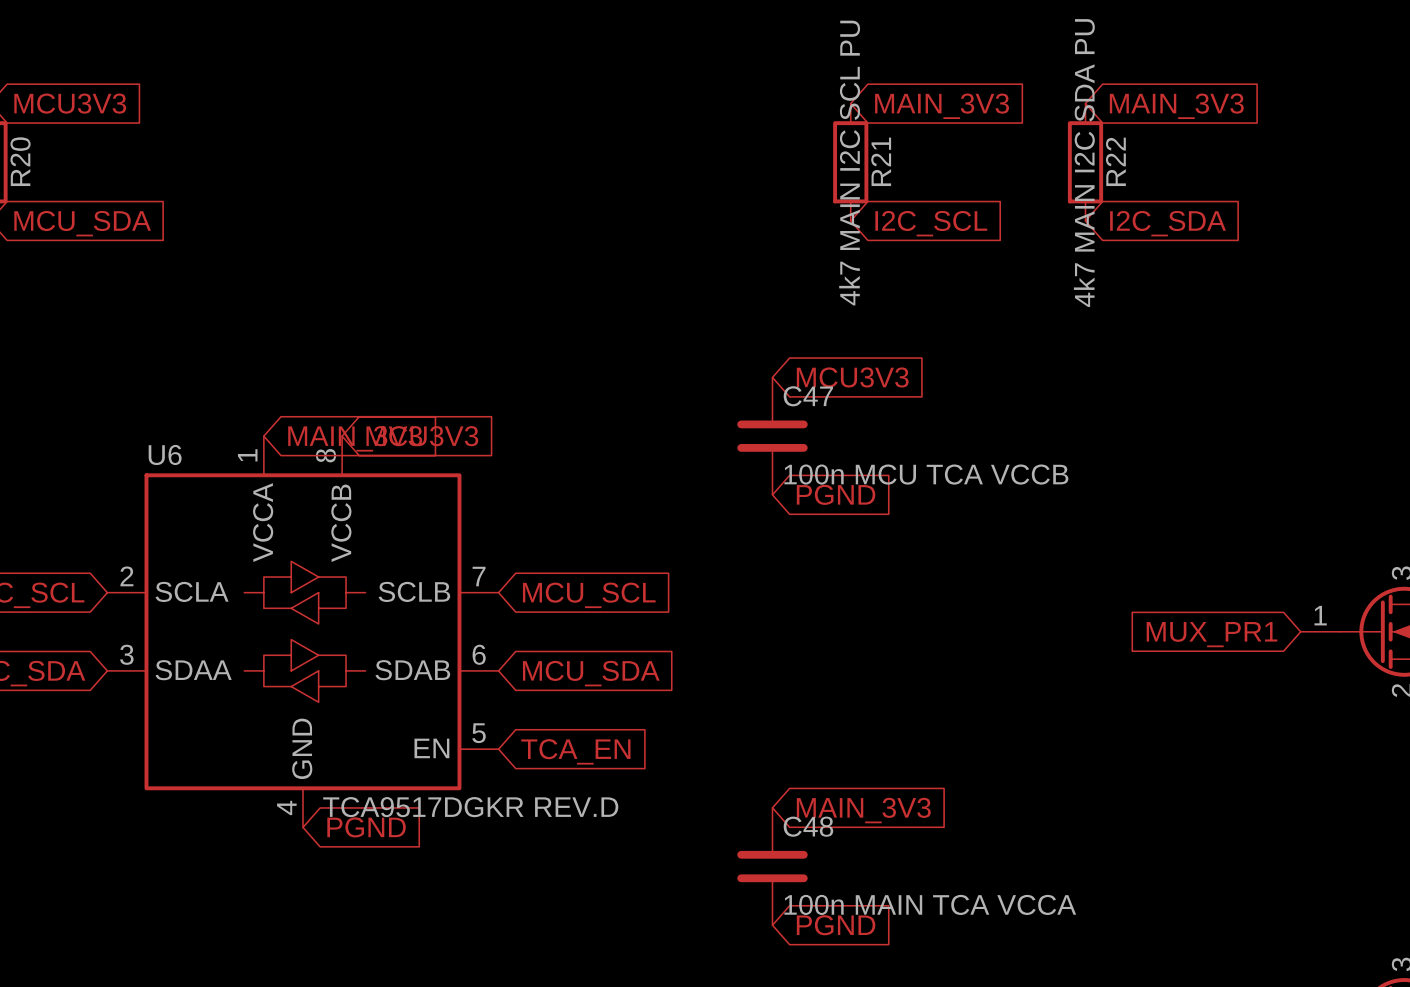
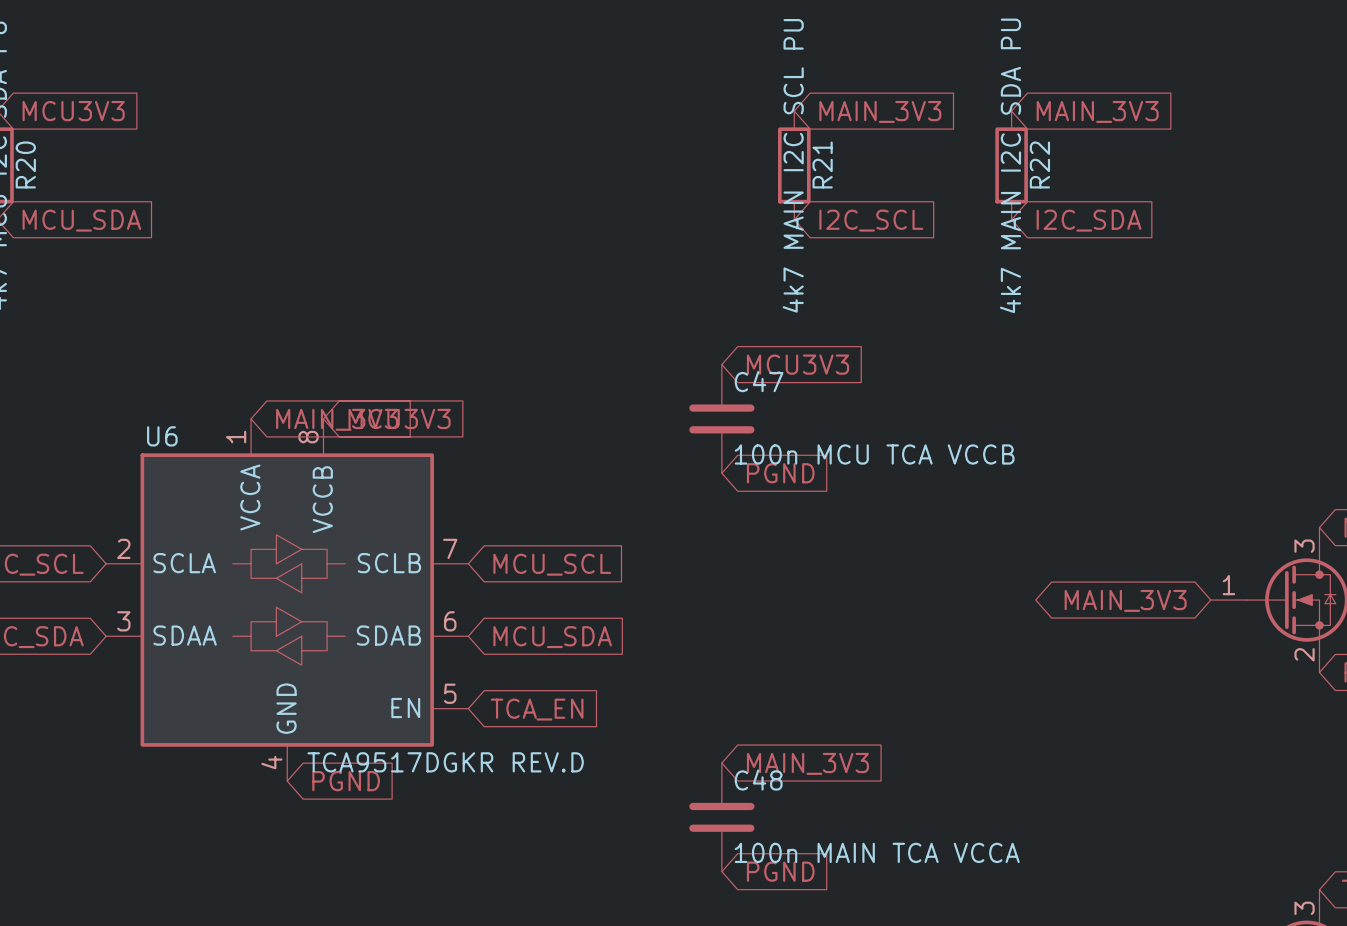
global label shape: input (1211, 634) -> bidirectional (1125, 600)
global label: MUX_PR1 (1211, 634) -> MAIN_3V3 (1125, 600)

